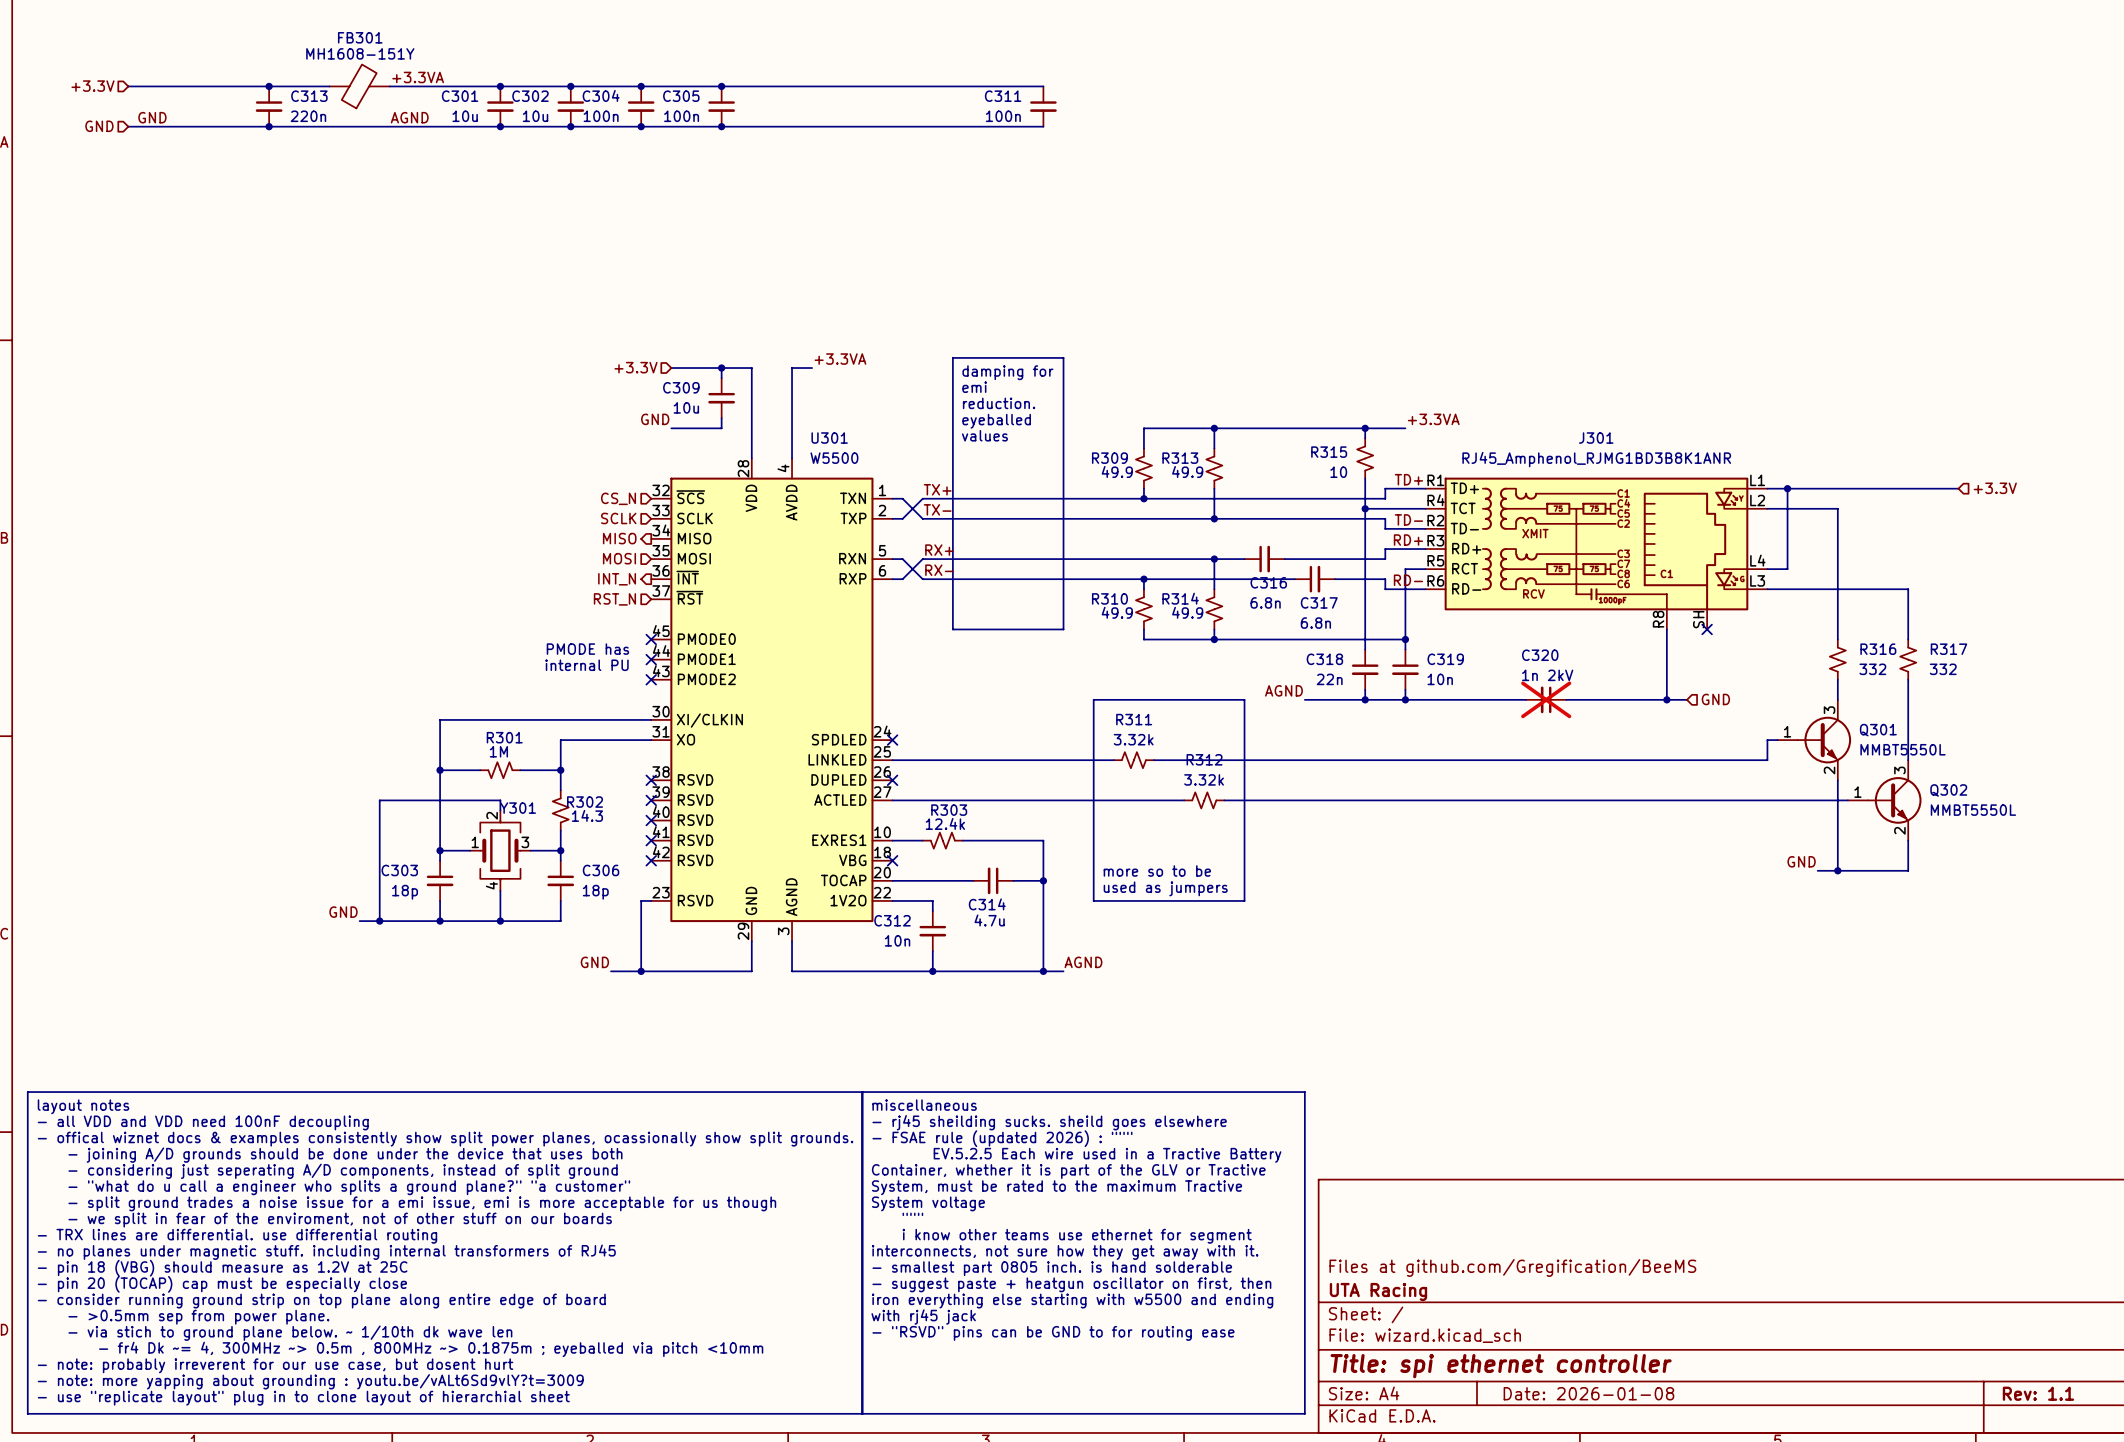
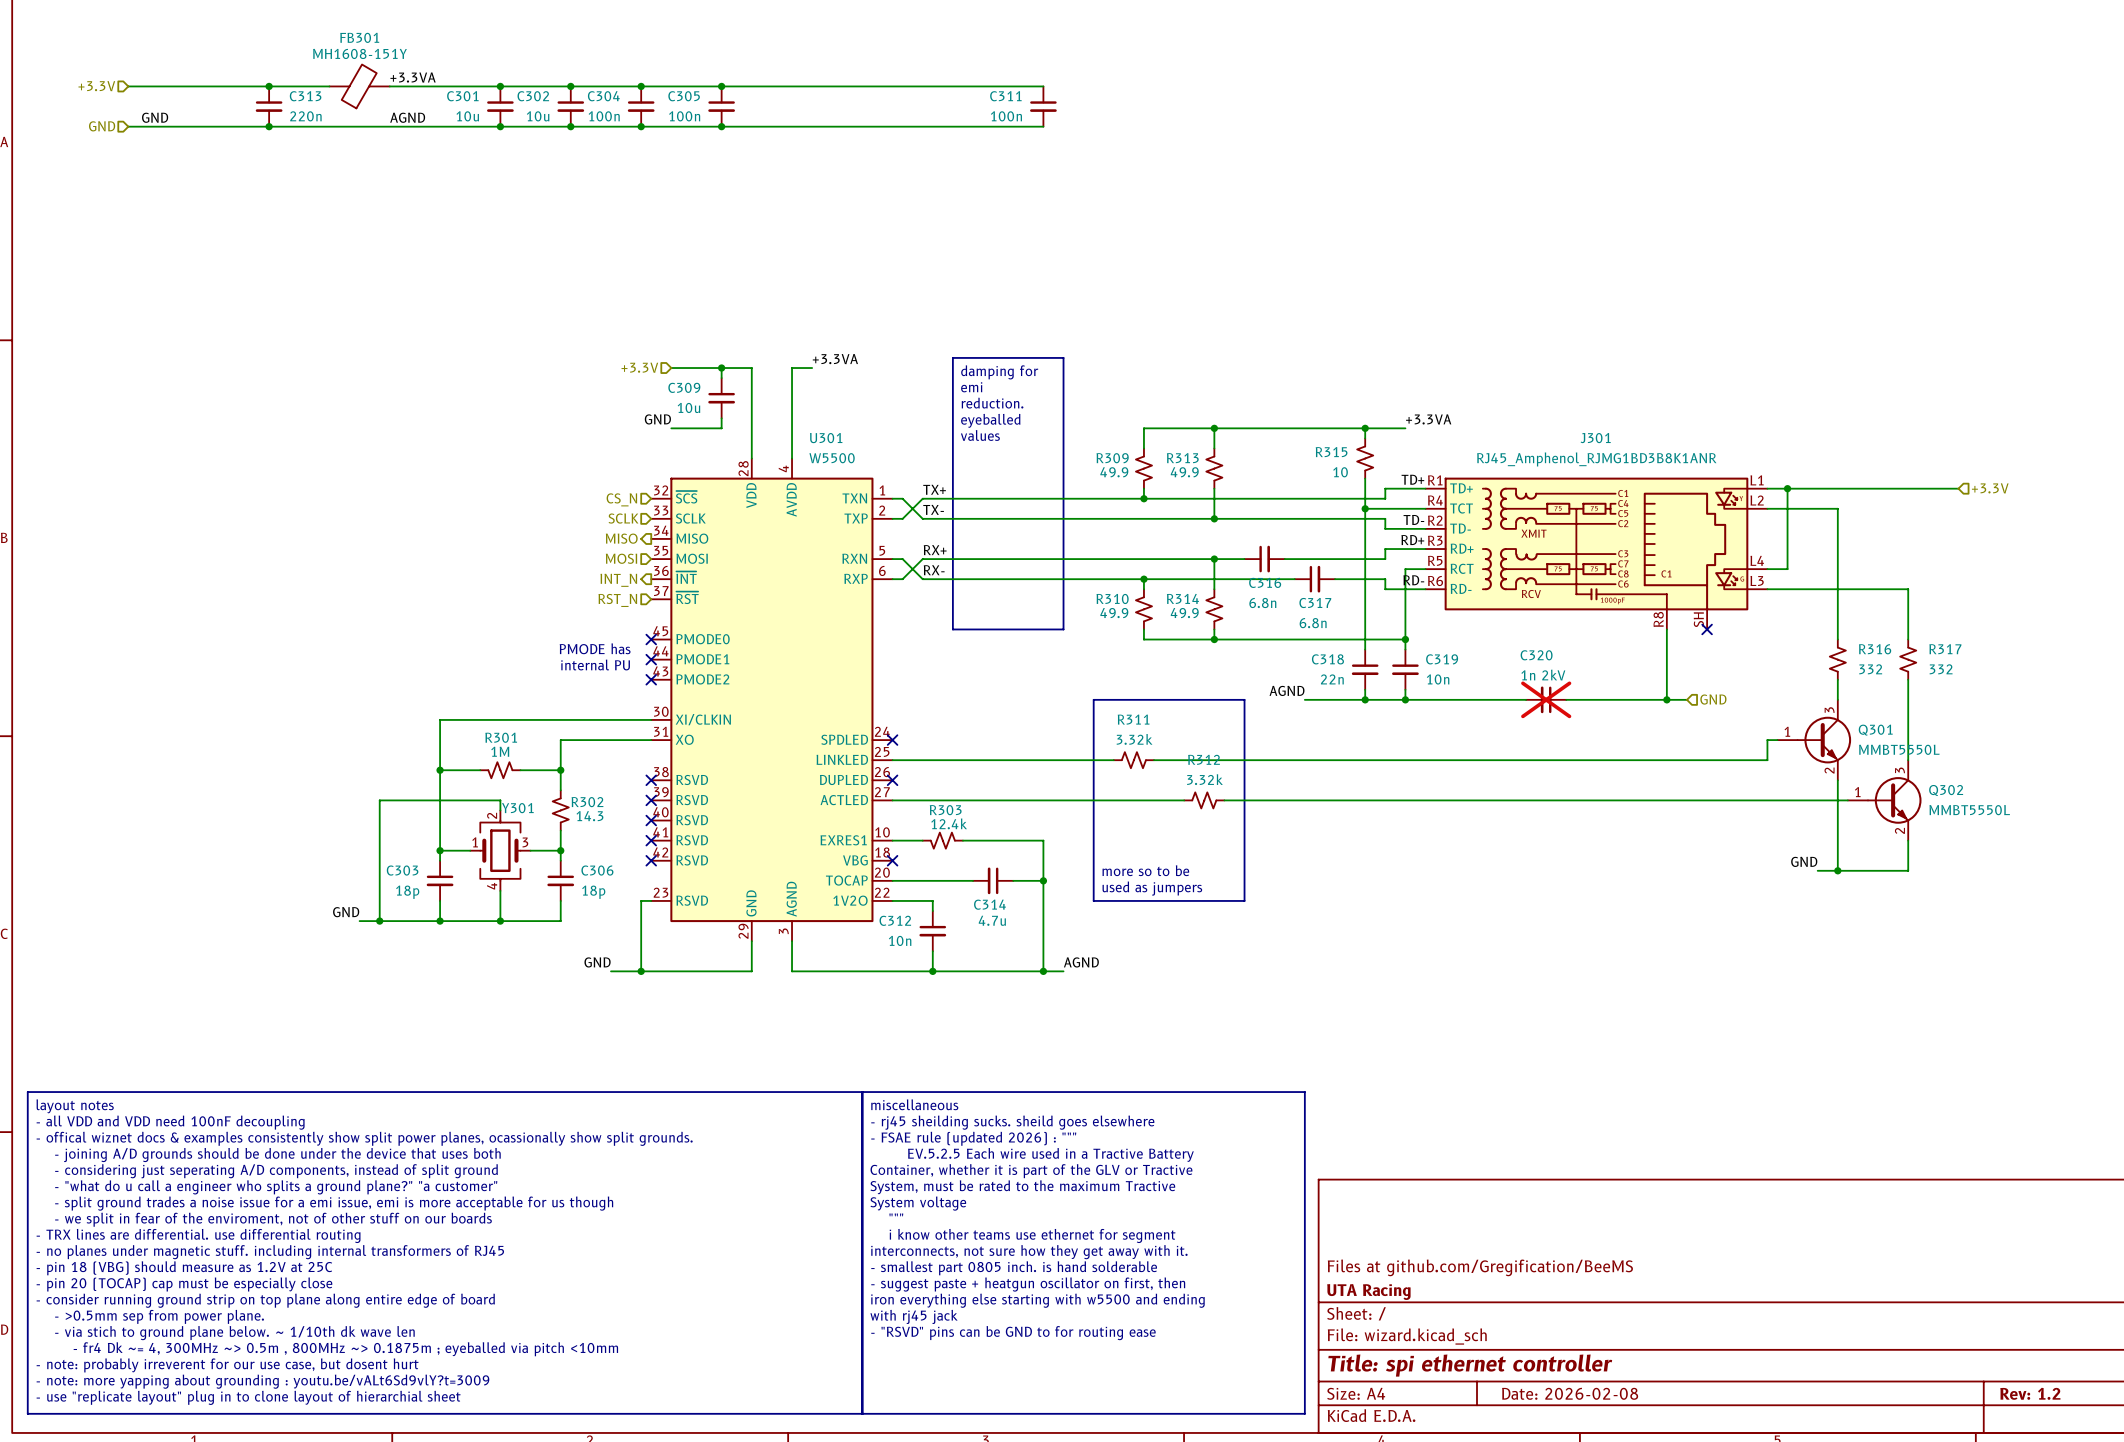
title block: Date: 2026-01-08 (1588, 1393) -> Date: 2026-02-08 (1570, 1393)
title block: Rev: 1.1 (2038, 1393) -> Rev: 1.2 (2030, 1393)

